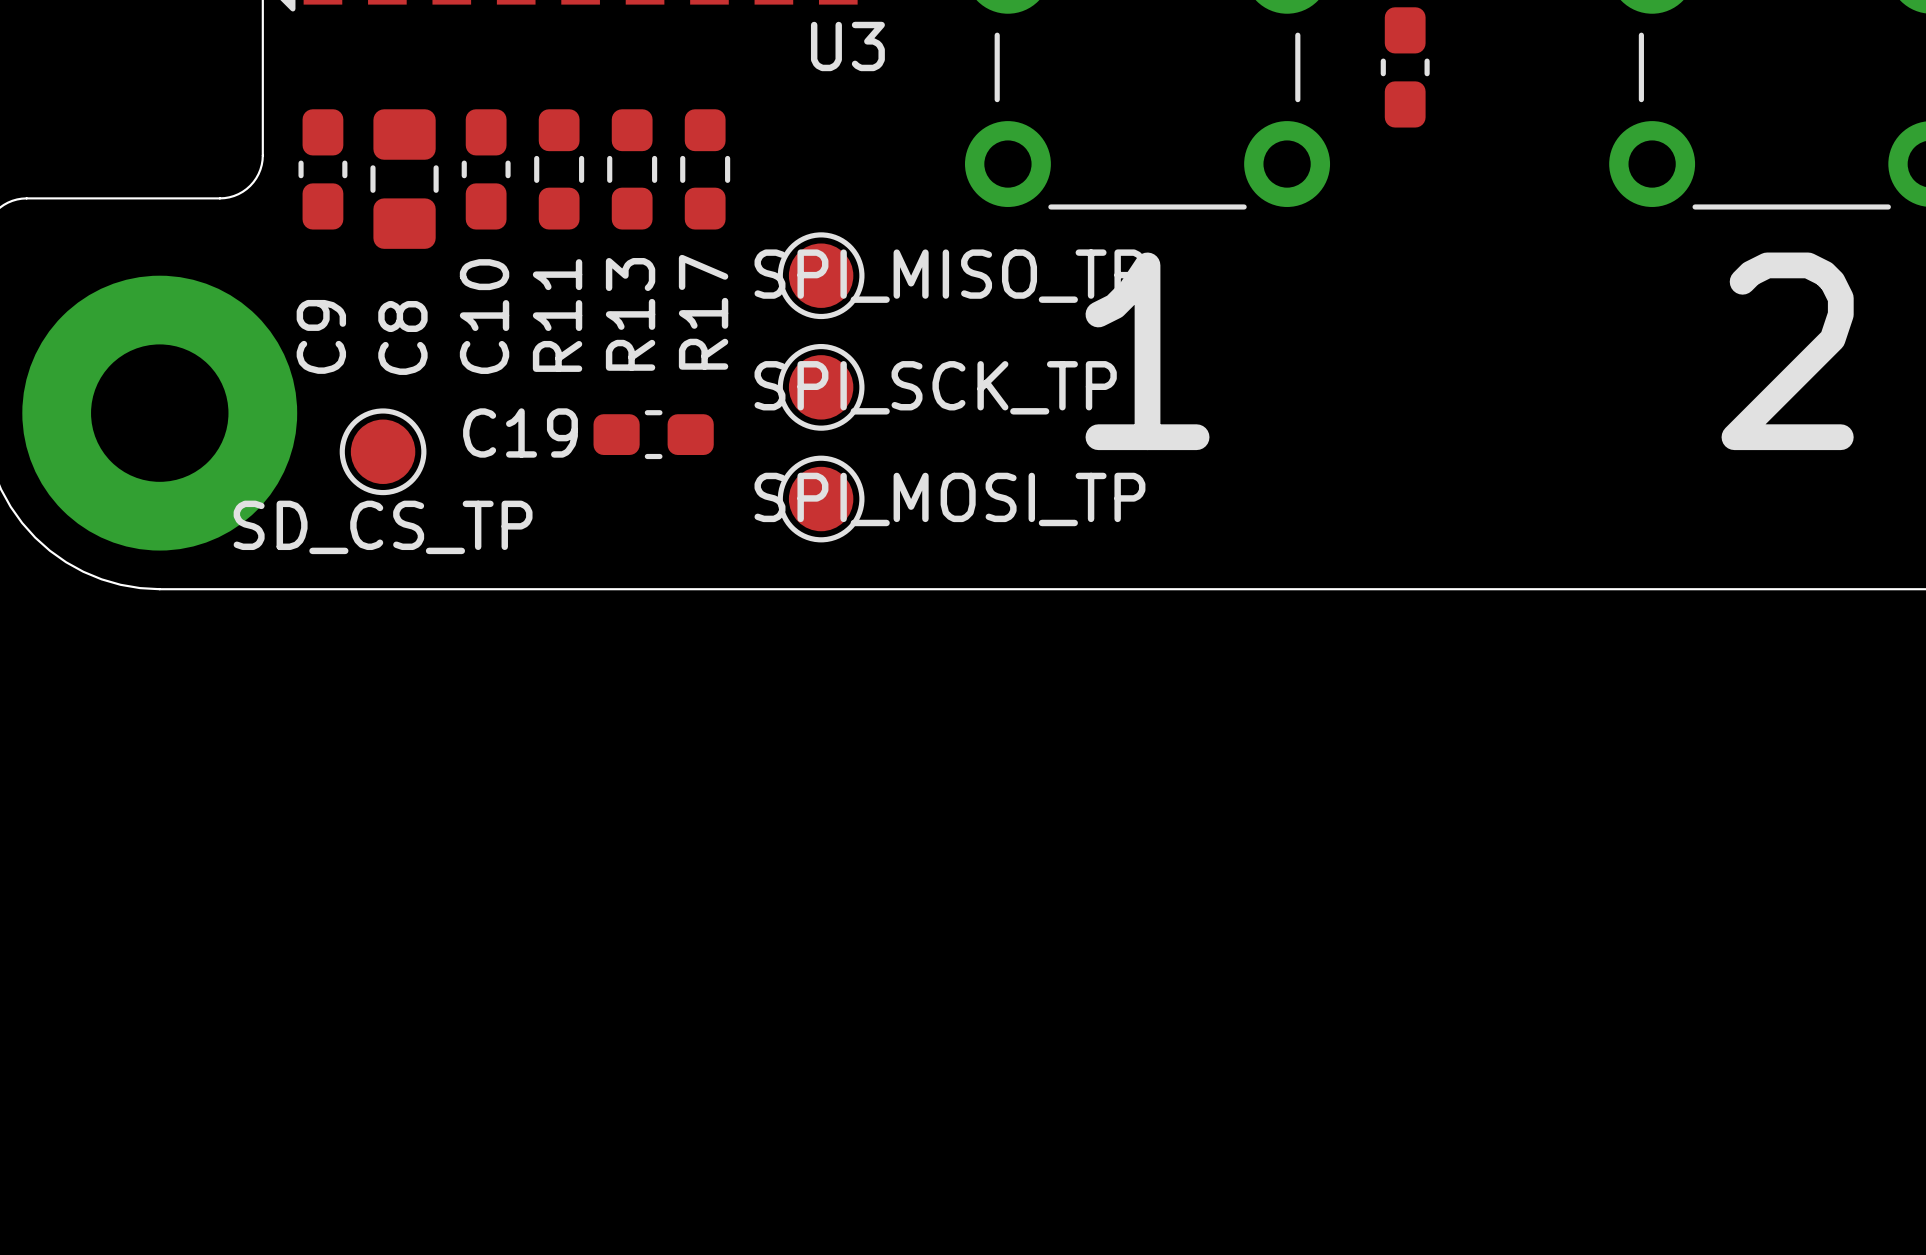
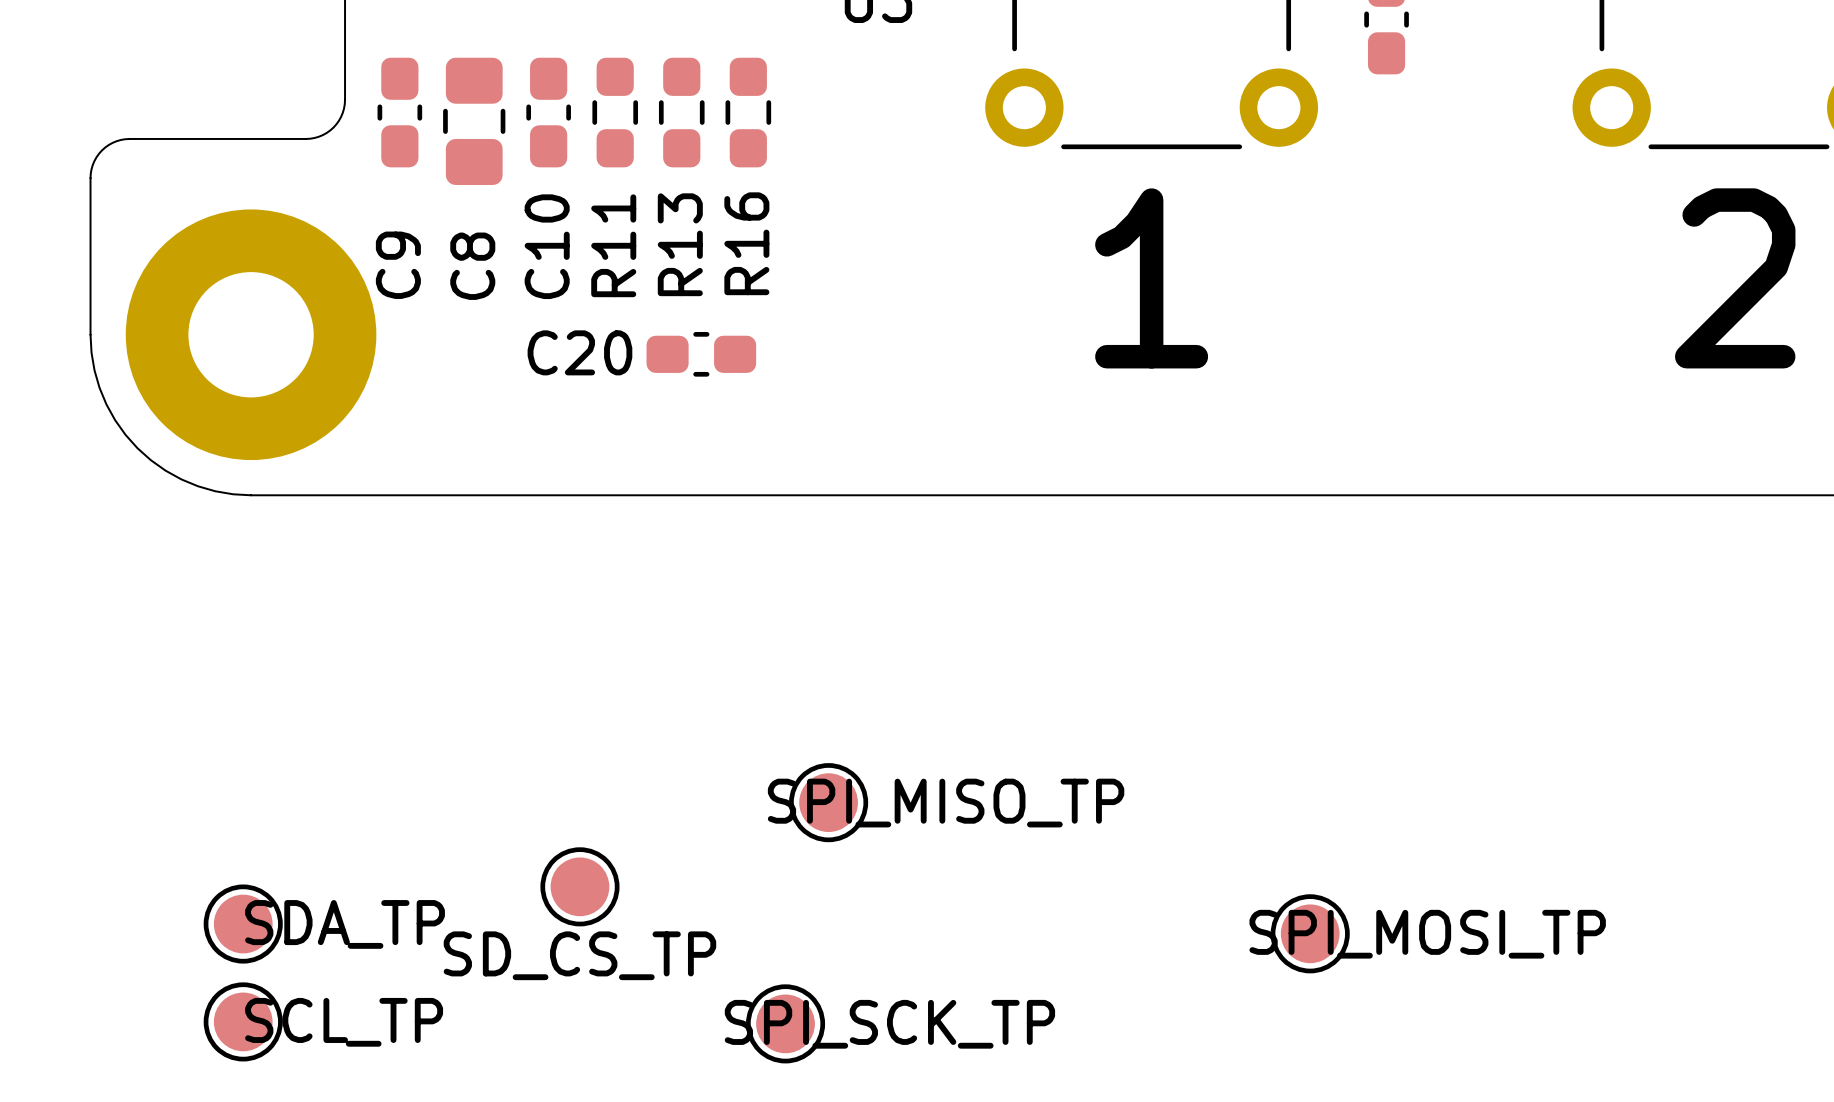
part position: (821, 275) -> (828, 802)
R17 name: R17 (703, 312) -> R16 (746, 243)
part position: (821, 387) -> (785, 1023)
C19 name: C19 (520, 432) -> C20 (579, 352)
part position: (383, 451) -> (579, 886)
part position: (821, 499) -> (1310, 933)
part: none -> SDA_TP (243, 924)
part: none -> SCL_TP (243, 1021)

